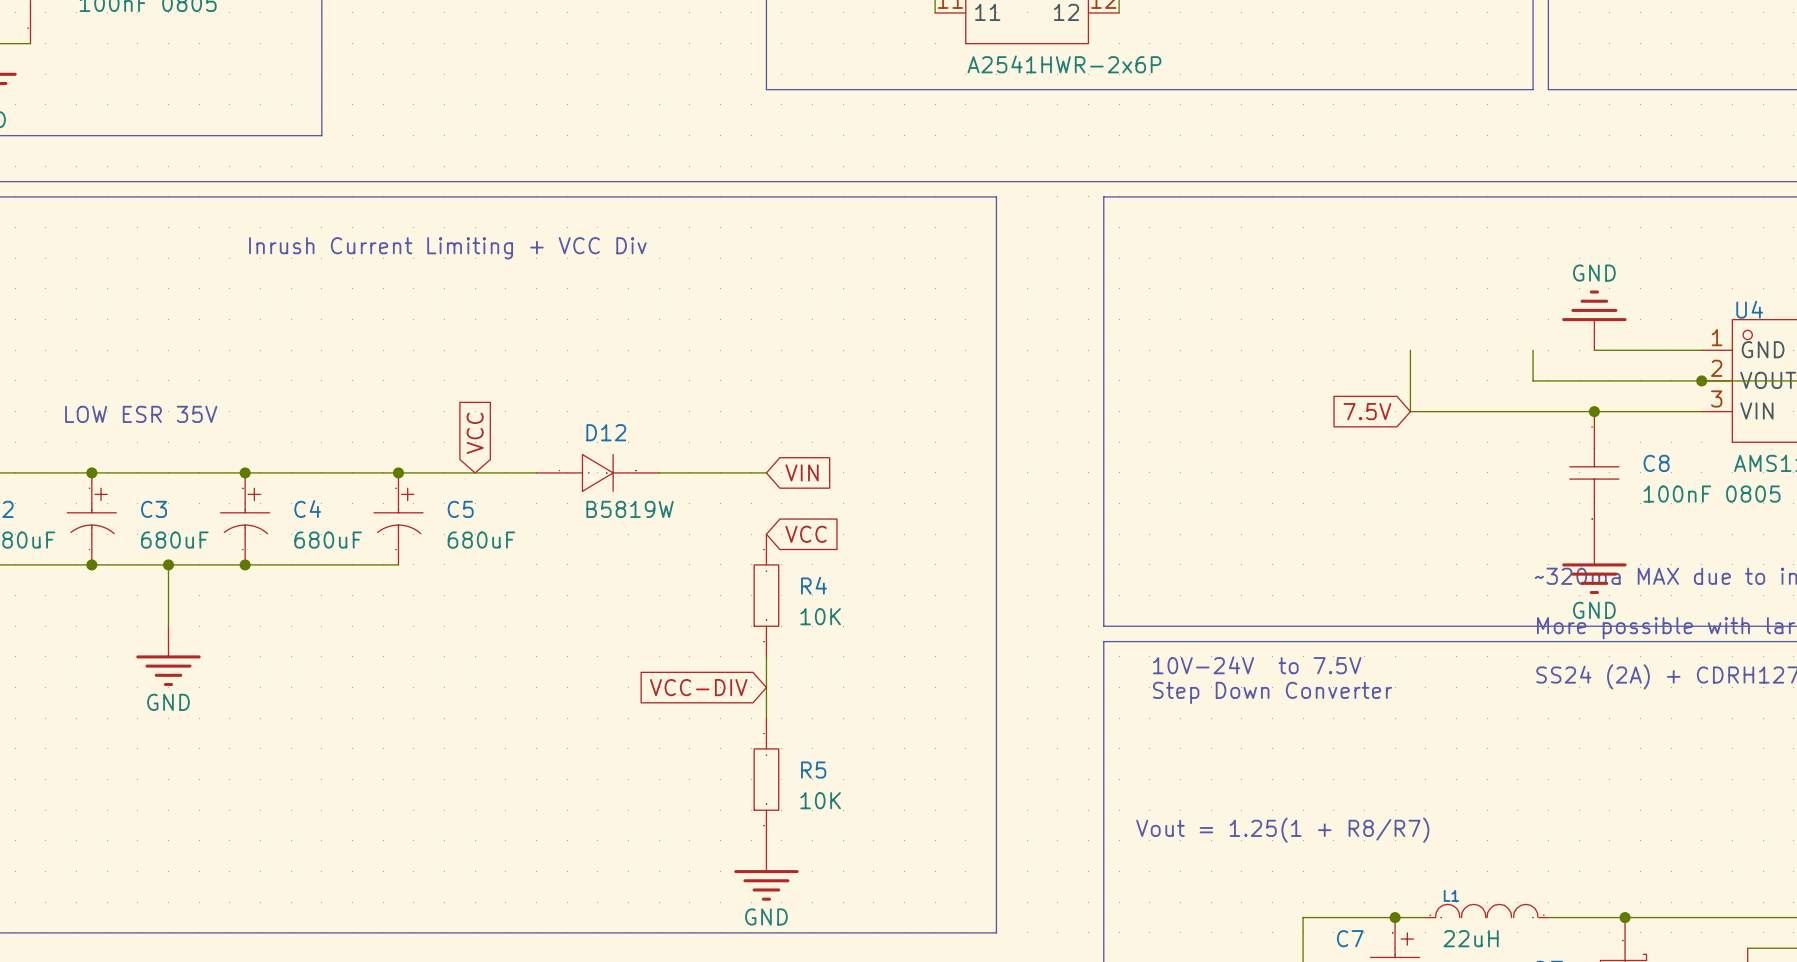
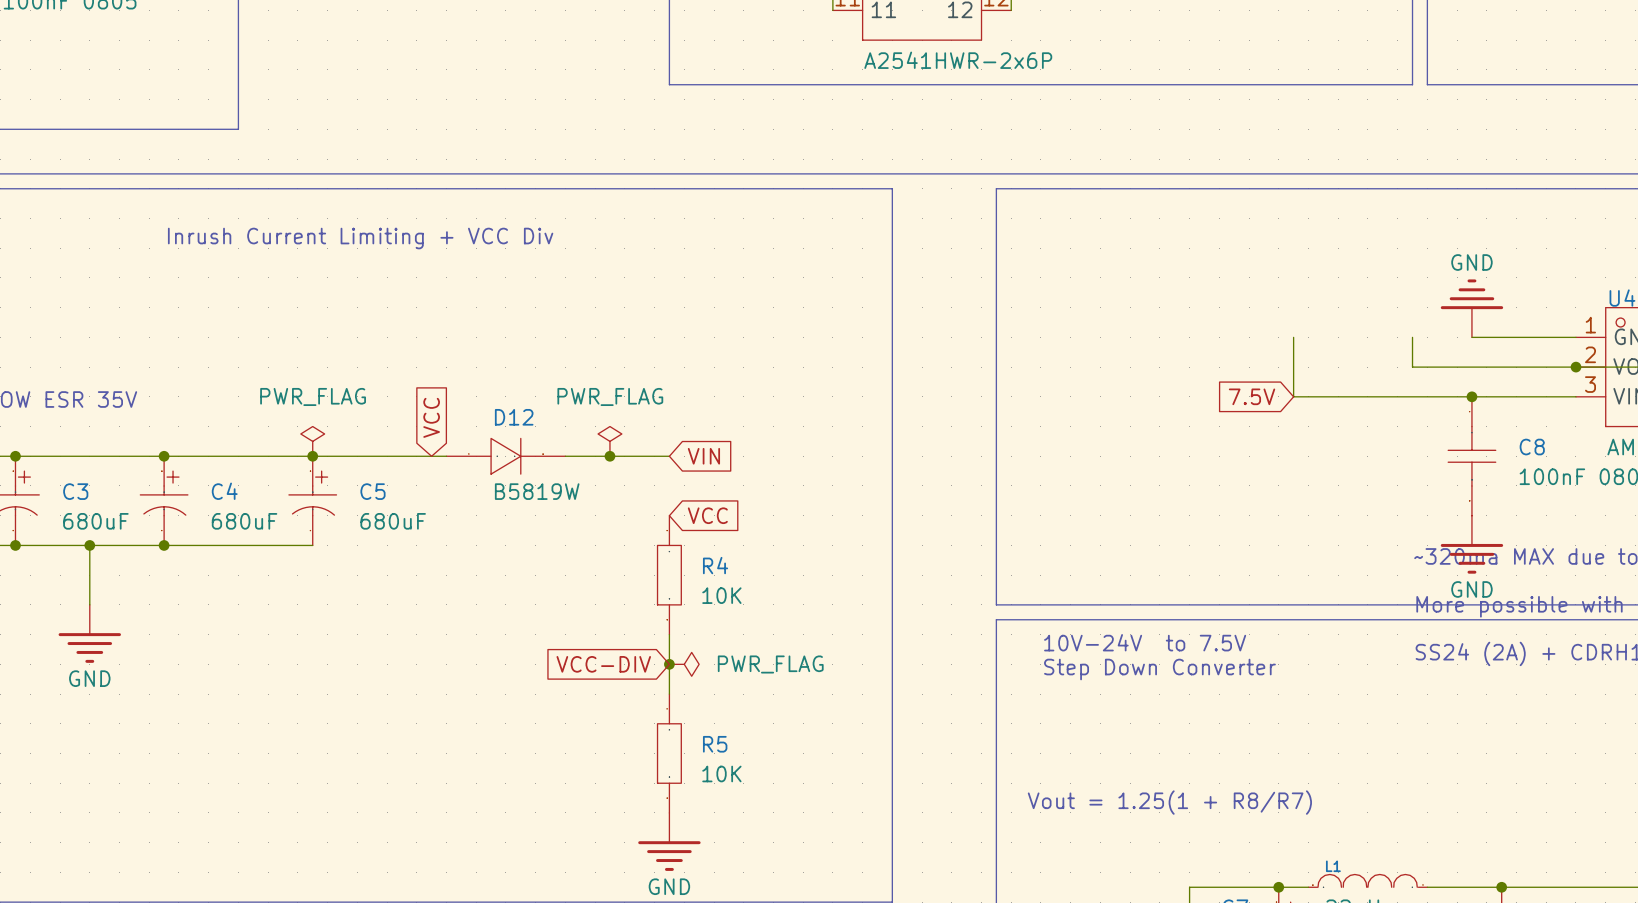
global label position: VCC (475, 433) -> VCC (431, 417)
power symbol: none -> PWR_FLAG (312, 441)
power symbol: none -> PWR_FLAG (609, 441)
junction: none -> (609, 456)
junction: none -> (669, 664)
power symbol: none -> PWR_FLAG (684, 664)

